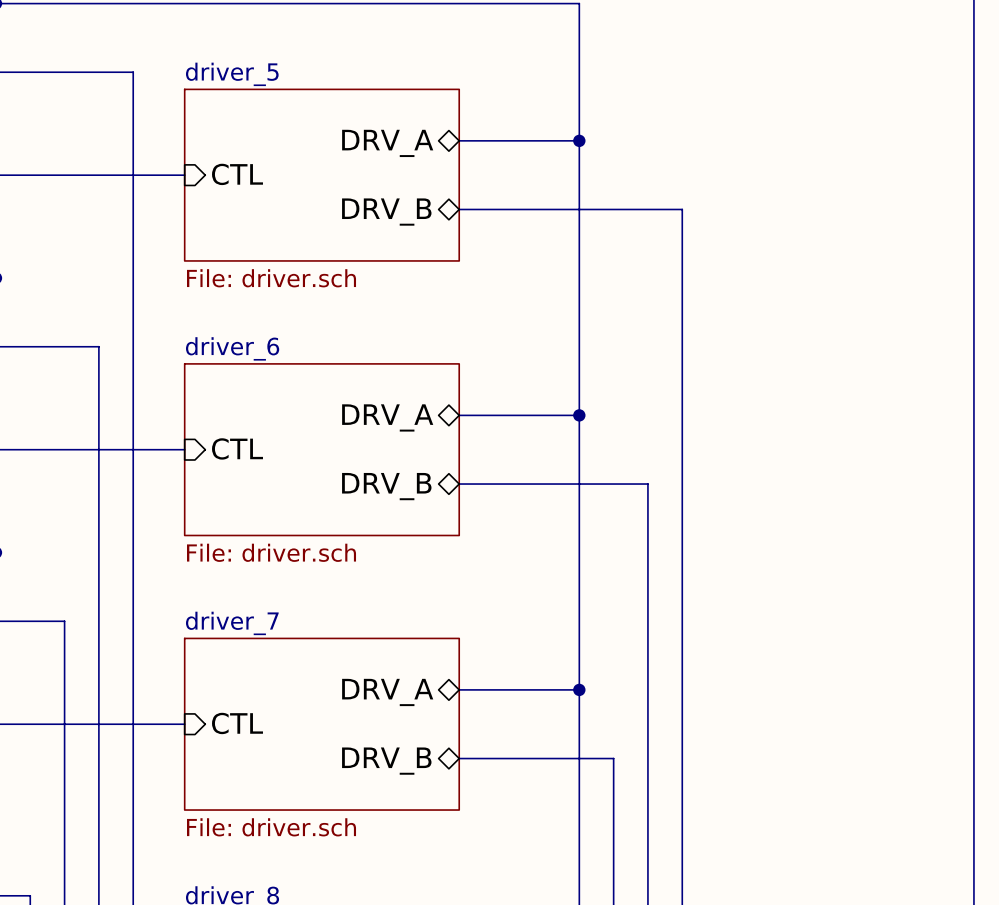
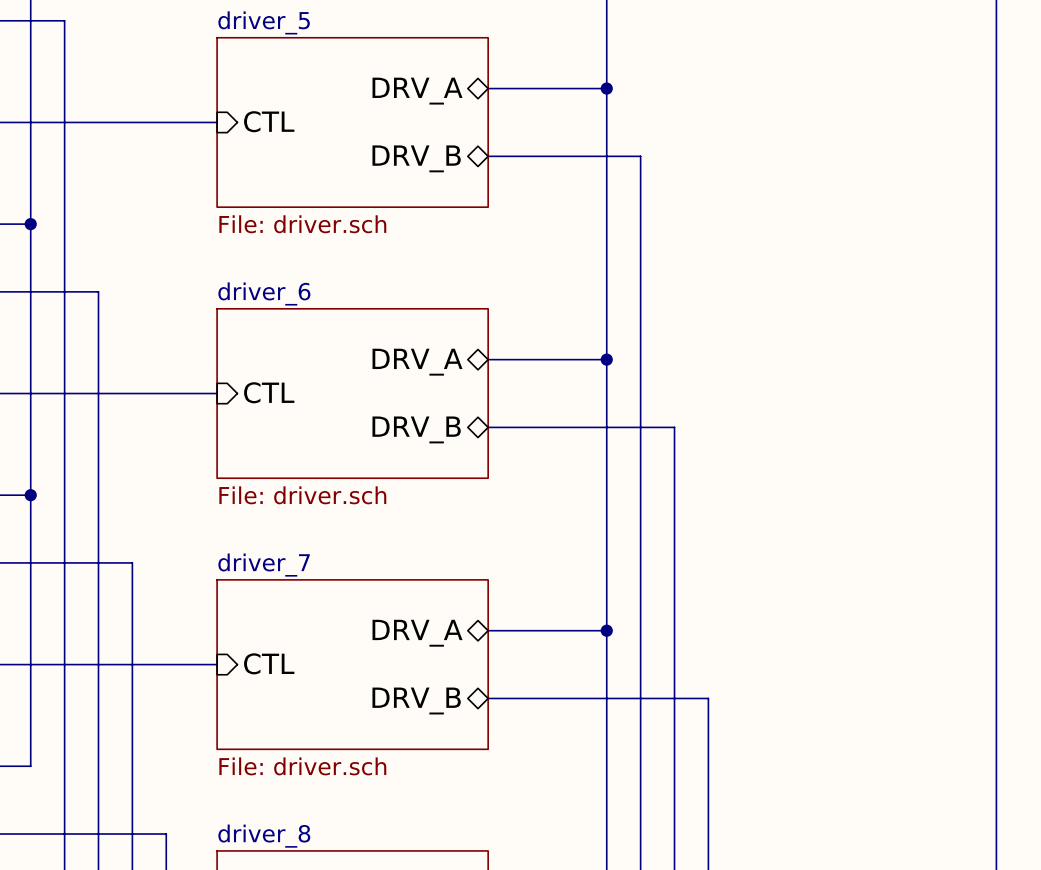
wire: (30, 72) (133, 72) (133, 895) -> (64, 20) (64, 834) (166, 834)
wire: (613, 209) (682, 209) (682, 758) -> (640, 156) (640, 698) (708, 698)
wire: (64, 346) (98, 346) (98, 621) -> (98, 291) (98, 562) (132, 562)

